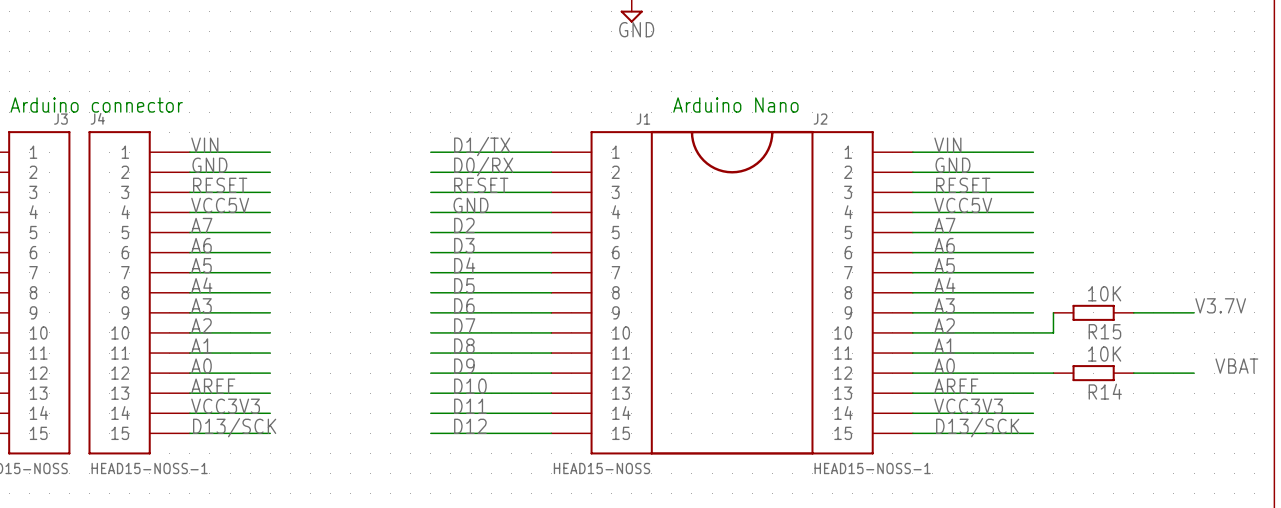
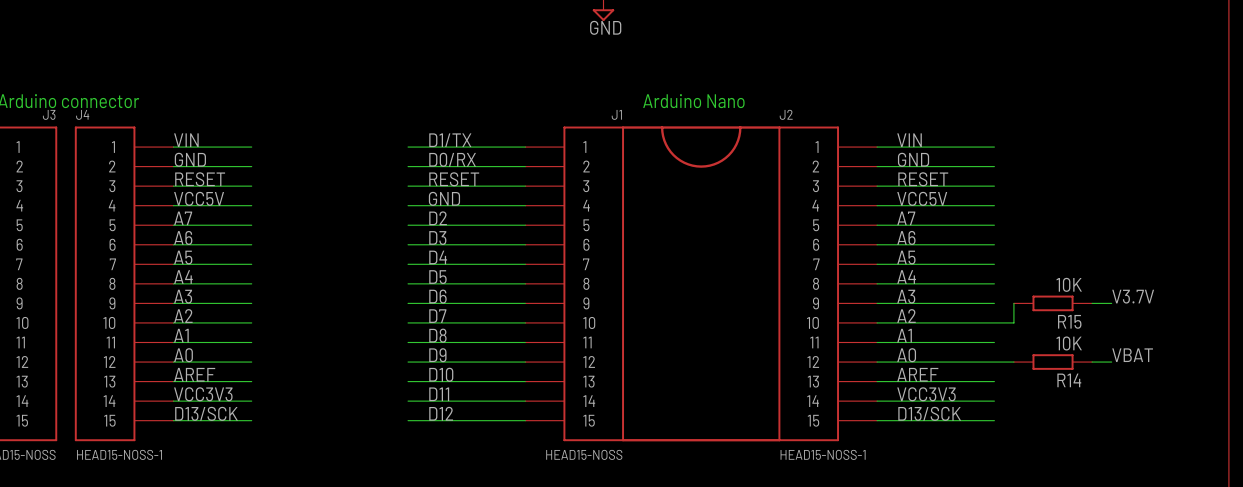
label position: V3.7V (1220, 305) -> V3.7V (1133, 296)
wire: (1153, 312) (1194, 312) -> none
label position: VBAT (1236, 366) -> VBAT (1132, 355)
wire: (1153, 373) (1194, 373) -> none

